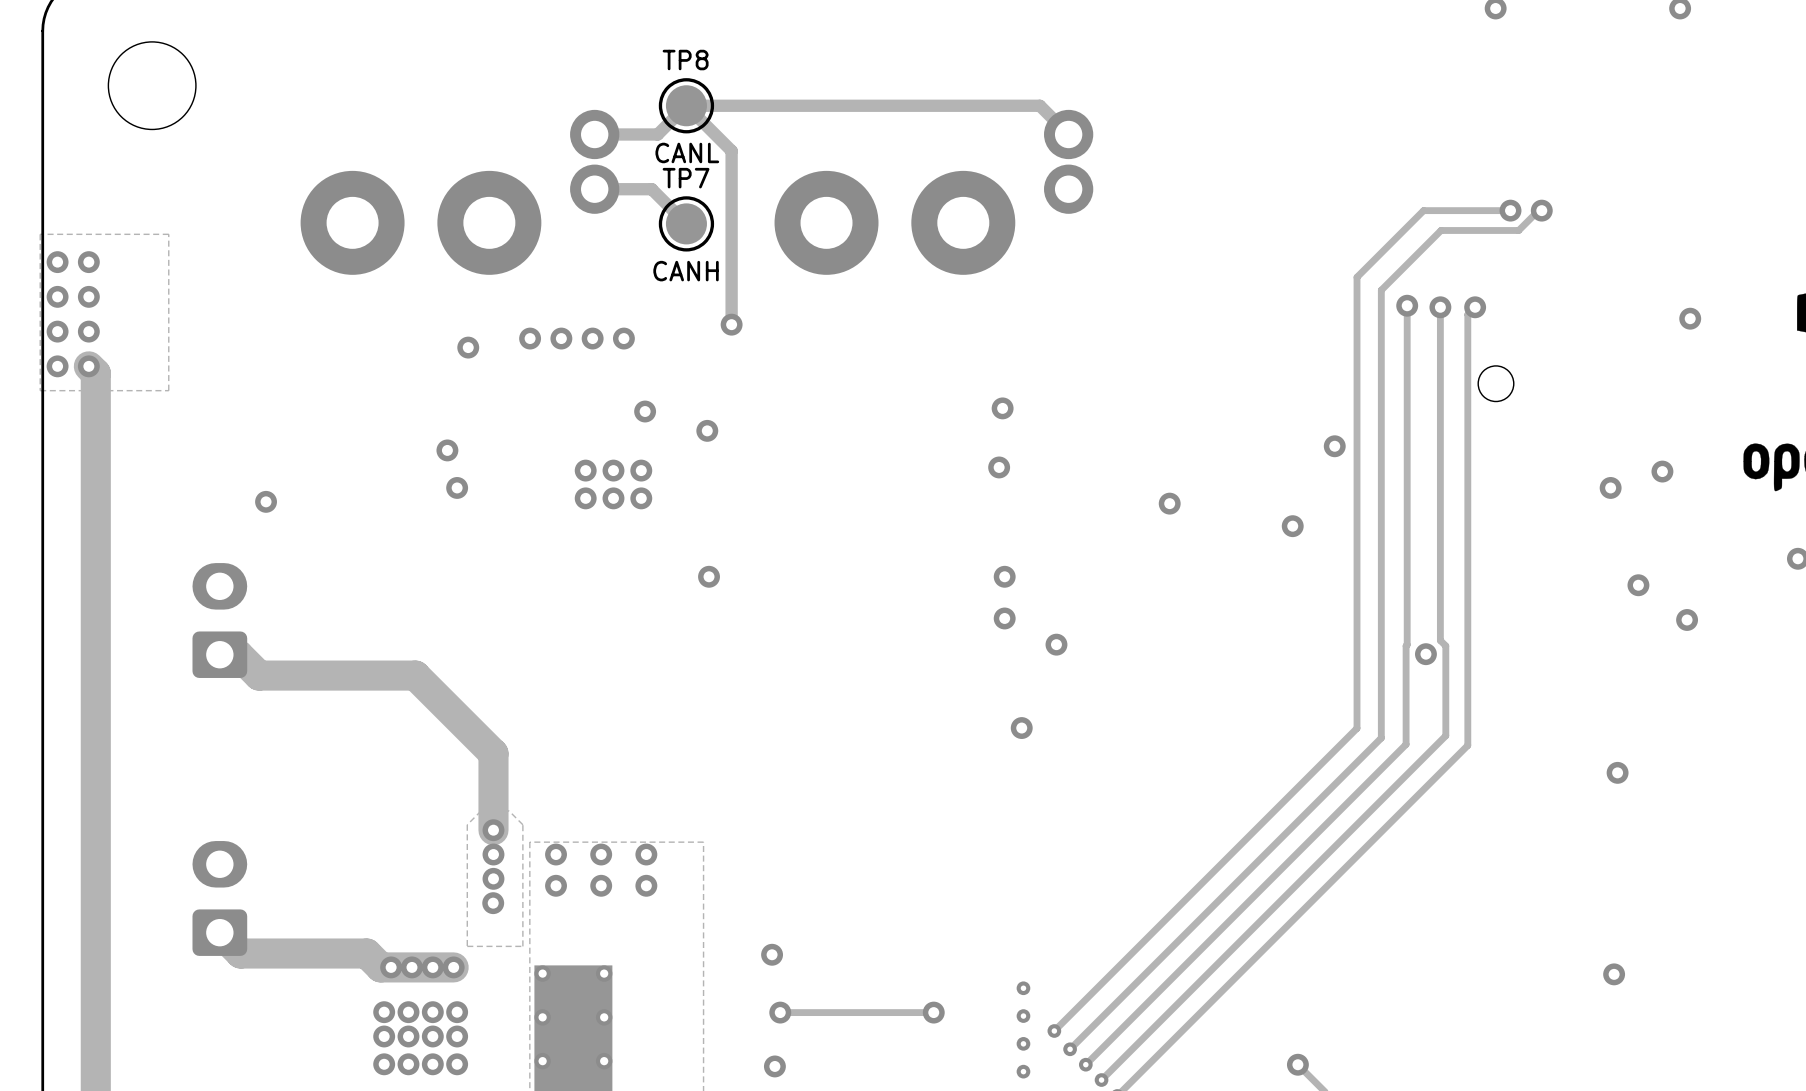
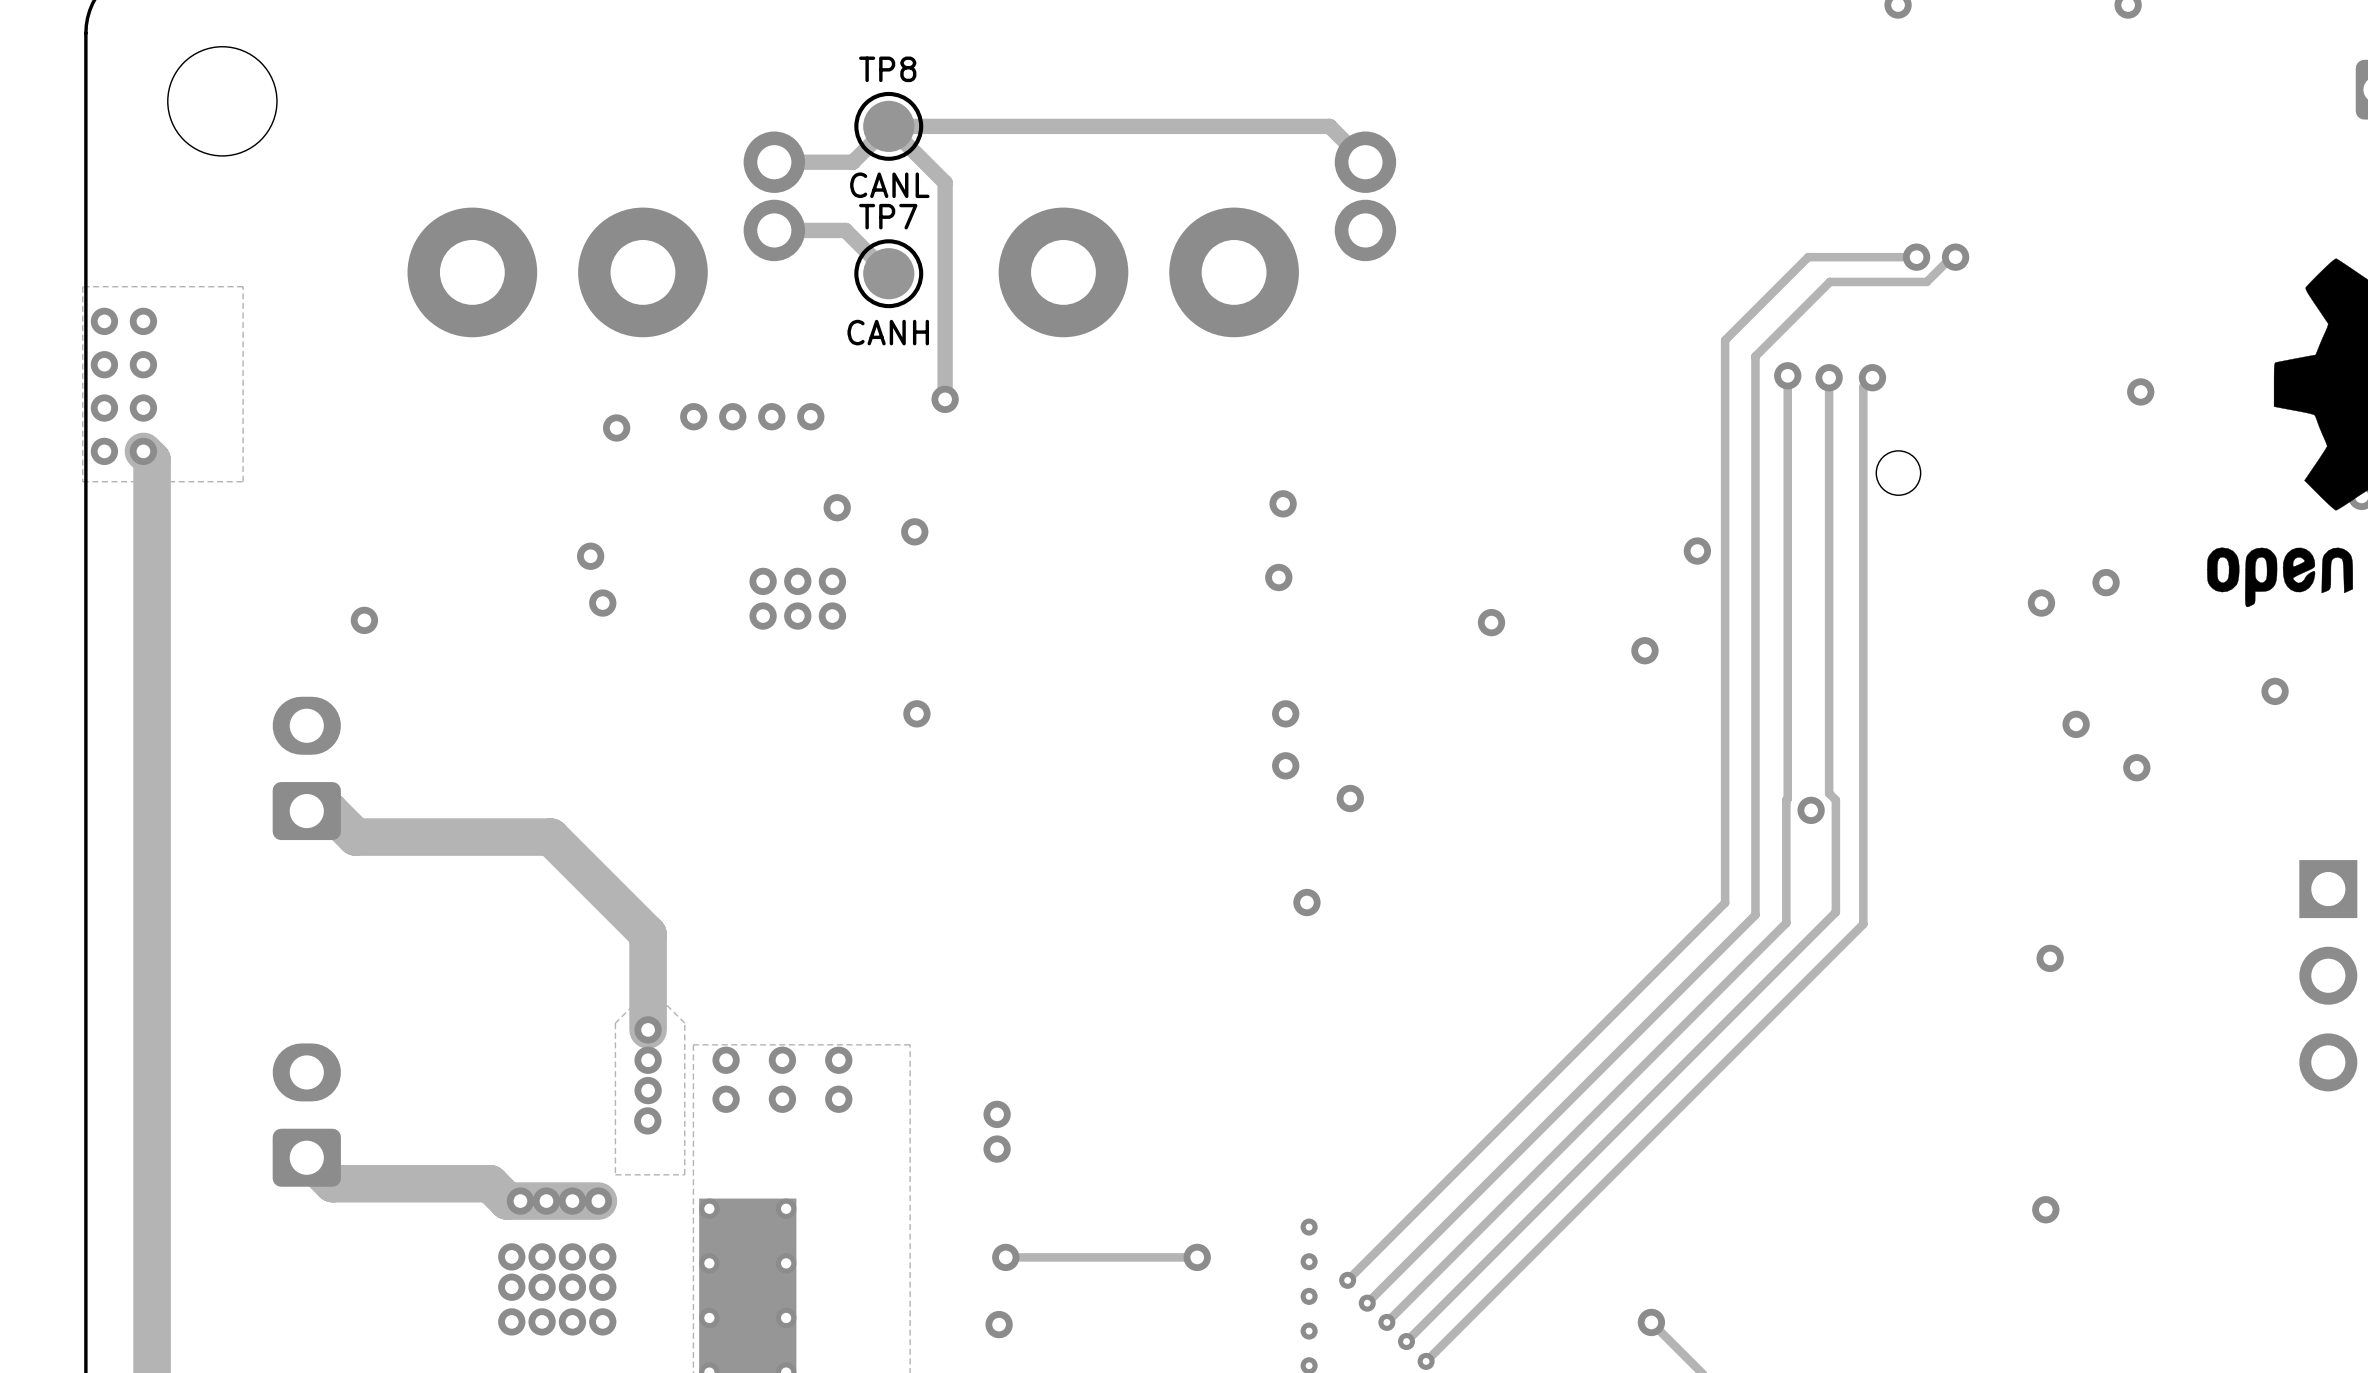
via: none -> (997, 1114)
via: none -> (997, 1149)
via: (772, 954) -> none

